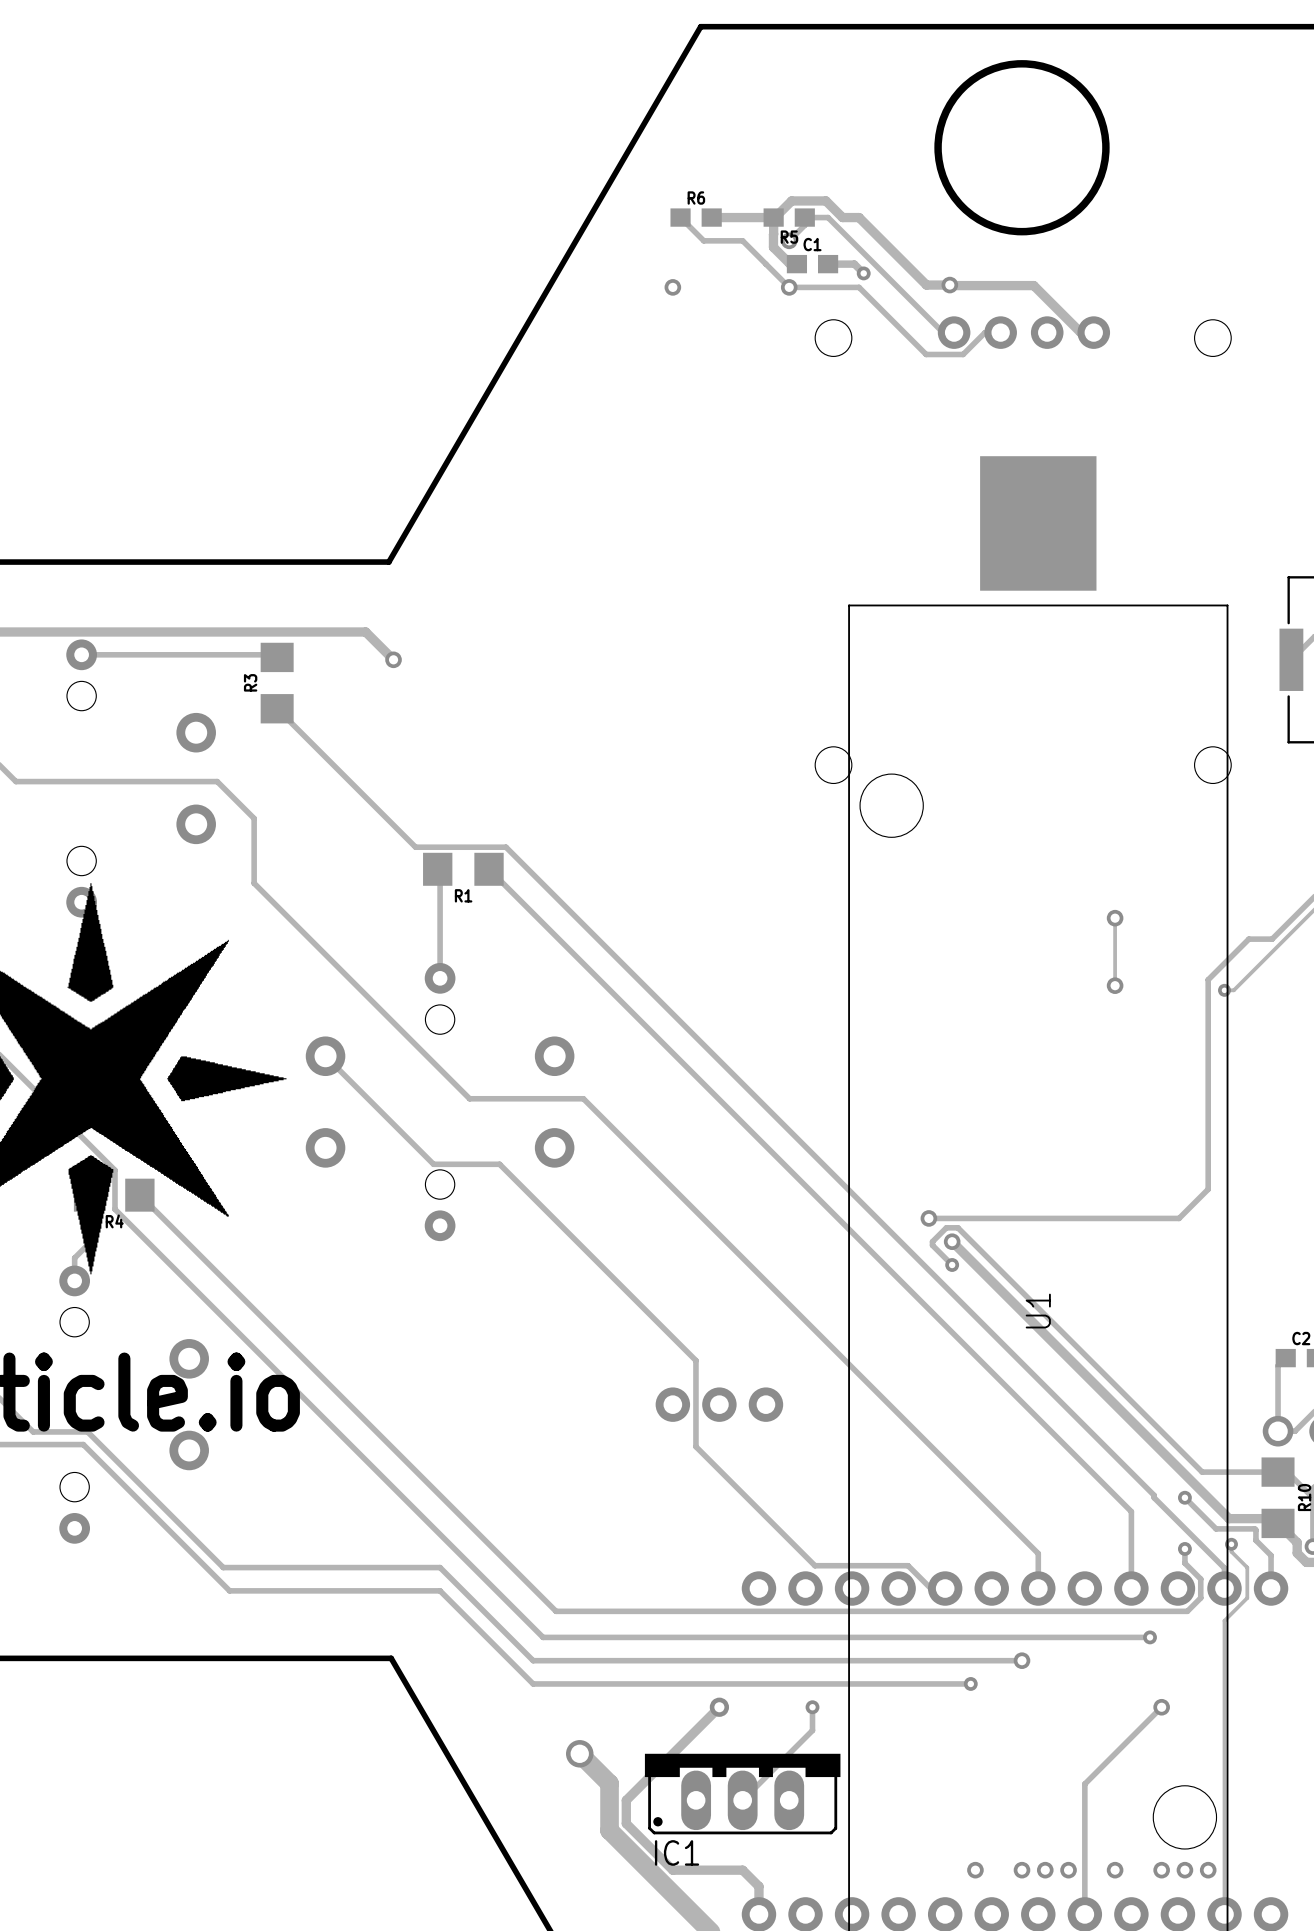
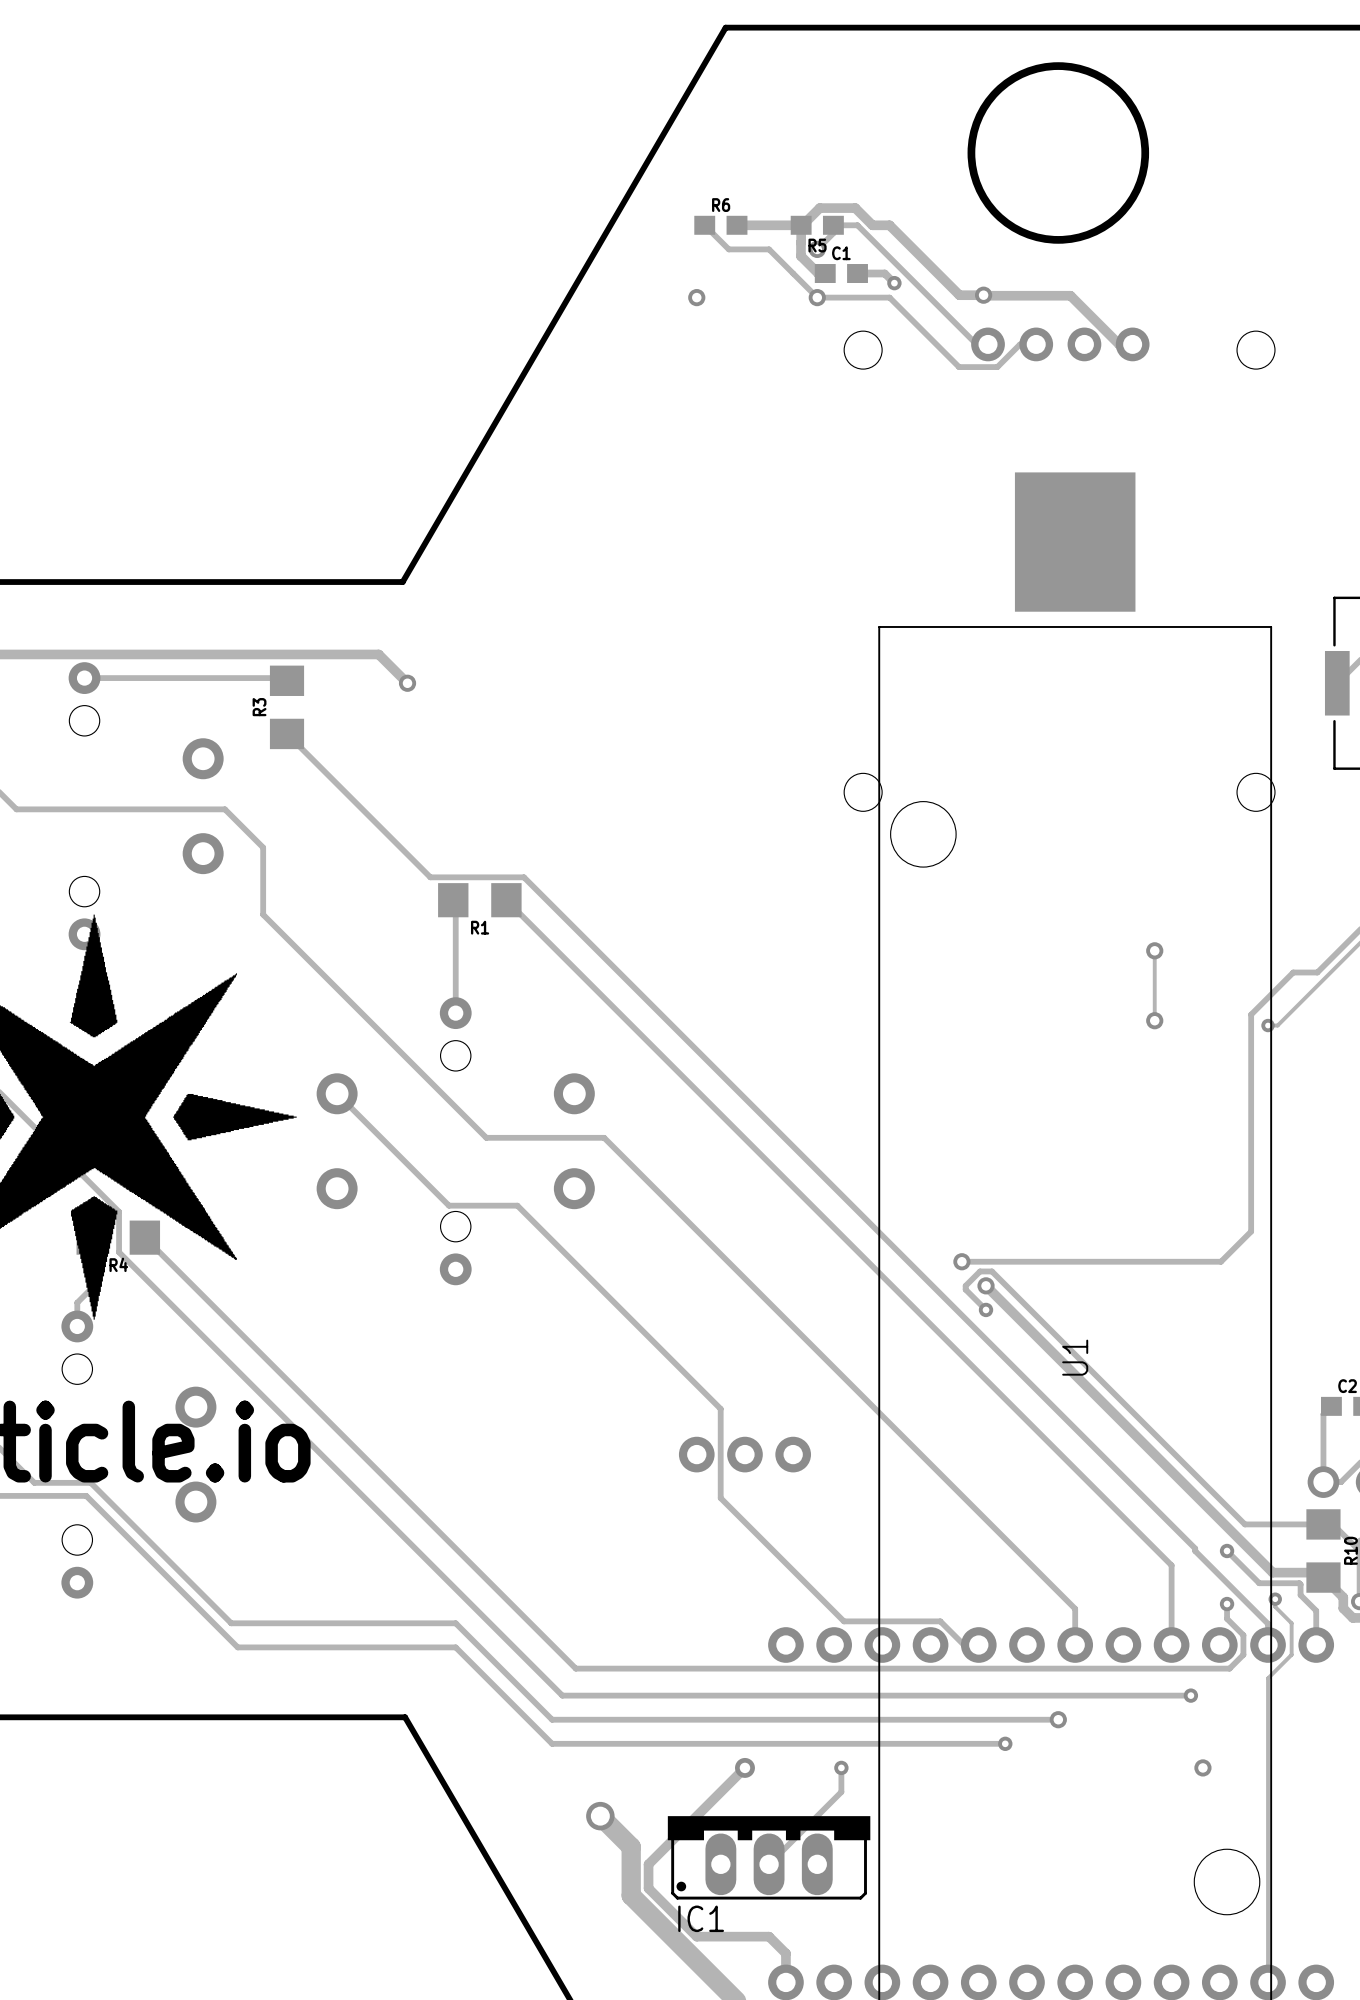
track: (1161, 1707) (1084, 1784) (1084, 1914) -> none
via: (975, 1870) -> none
via: (1021, 1870) -> none
via: (1045, 1870) -> none
via: (1068, 1870) -> none
via: (1115, 1870) -> none
via: (1161, 1870) -> none
via: (1184, 1870) -> none
via: (1208, 1870) -> none

